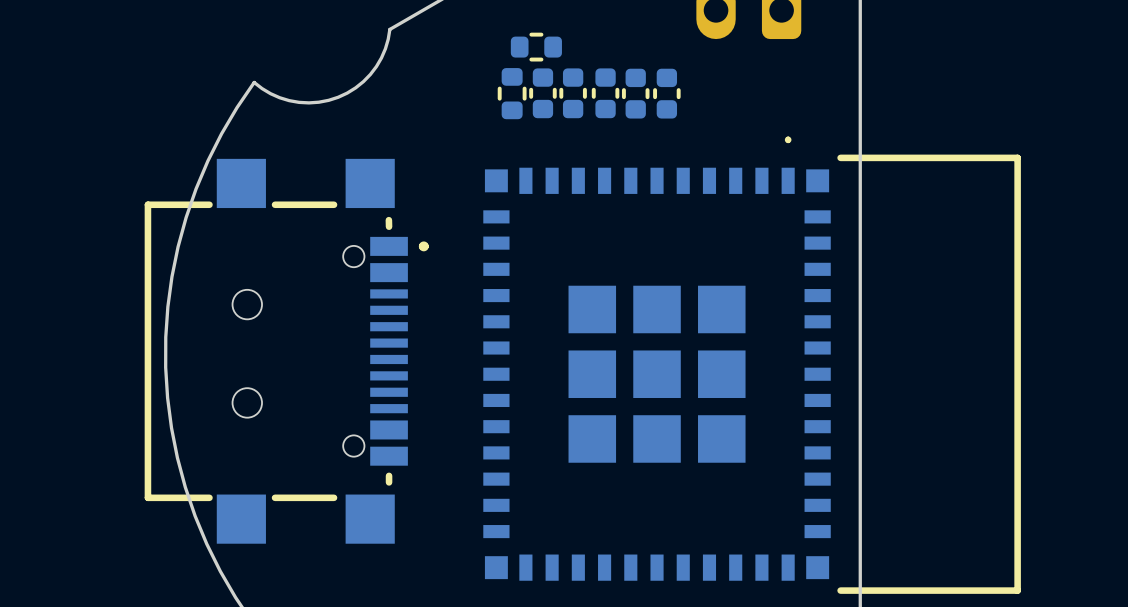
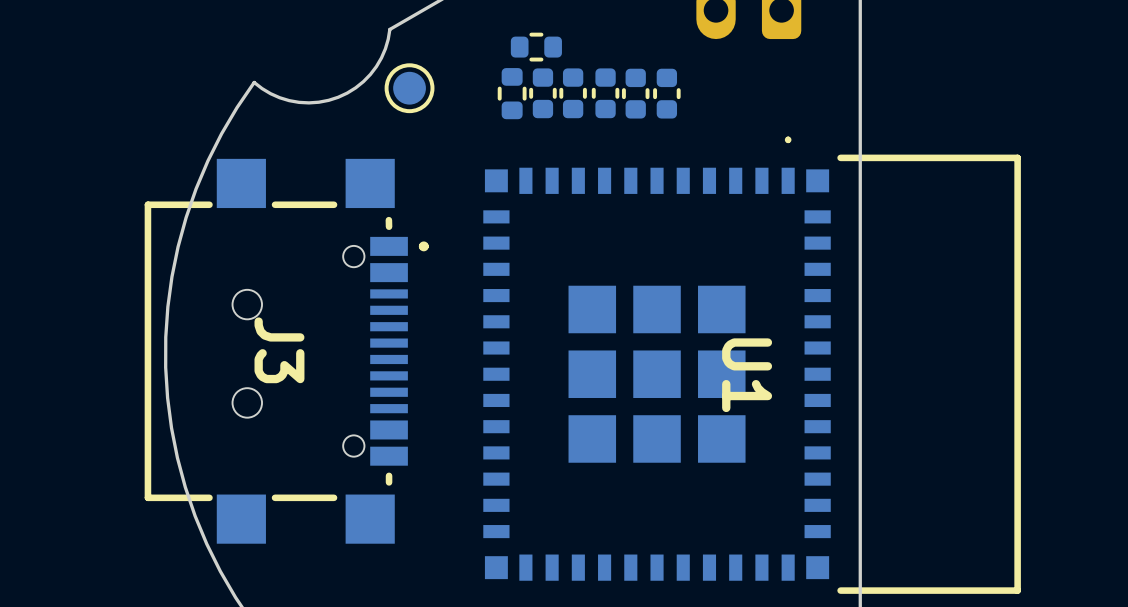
part: none -> (409, 88)
J3 name: none -> J3 (279, 350)
U1 name: none -> U1 (747, 375)

